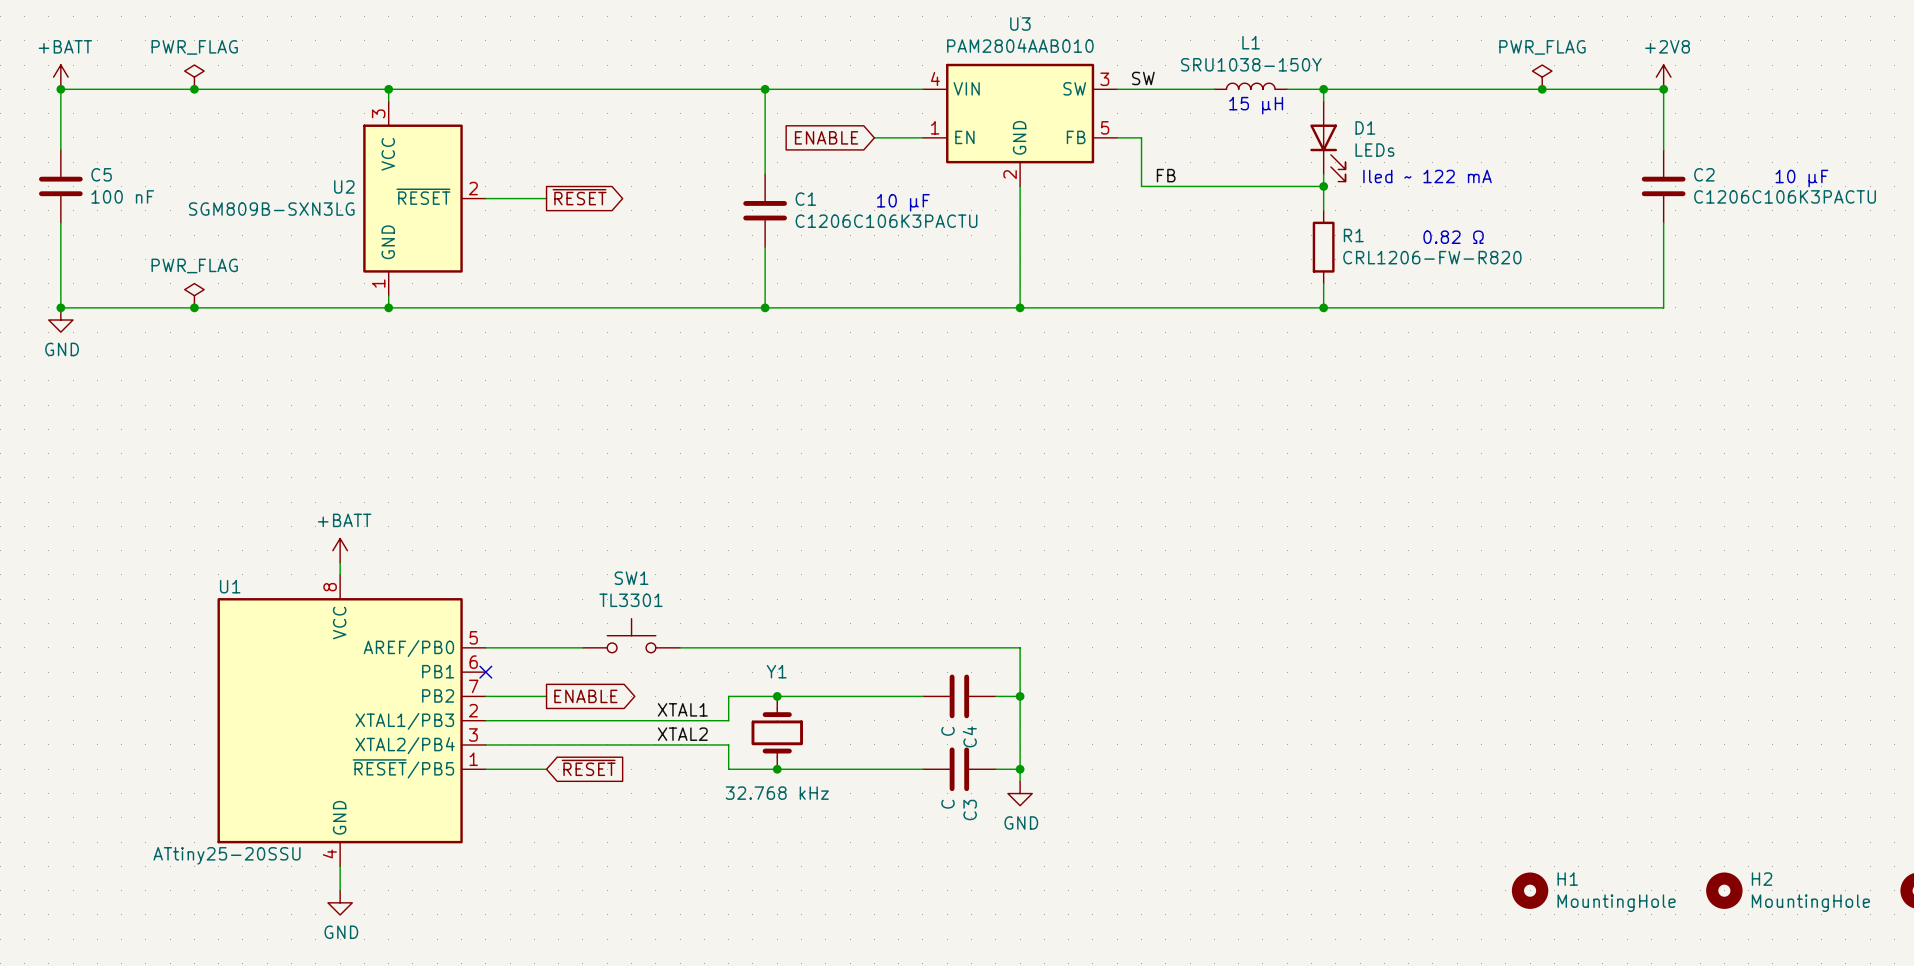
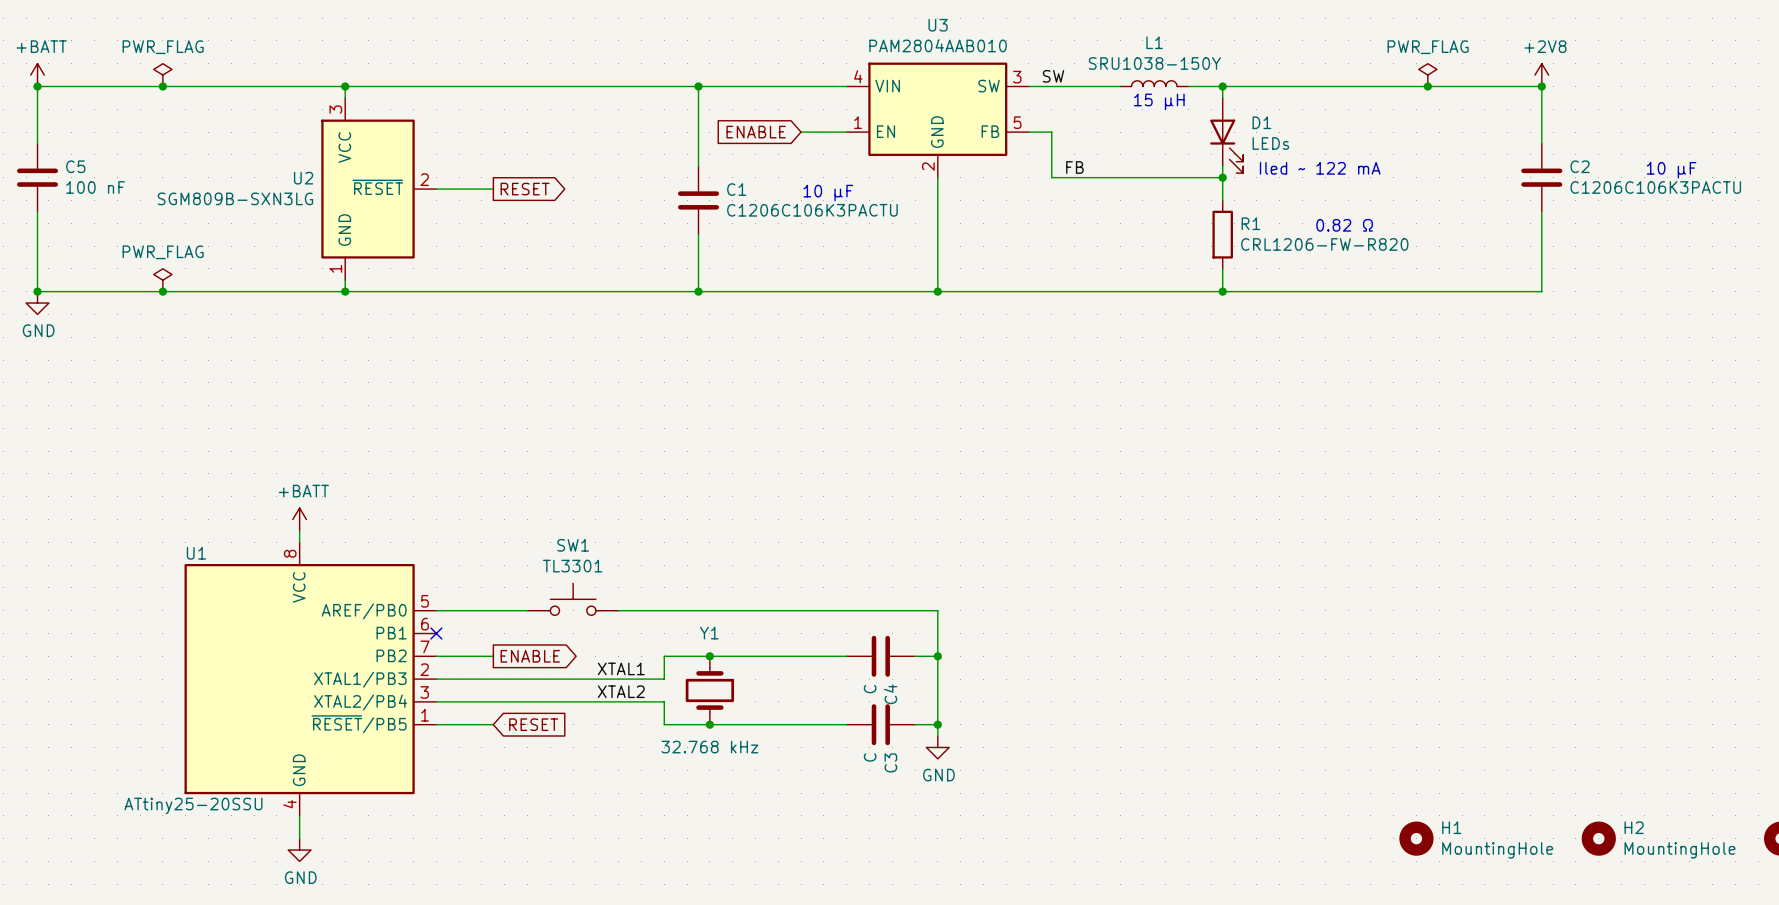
global label: ~{RESET} (579, 197) -> RESET (525, 189)
global label: ~{RESET} (588, 767) -> RESET (533, 724)

